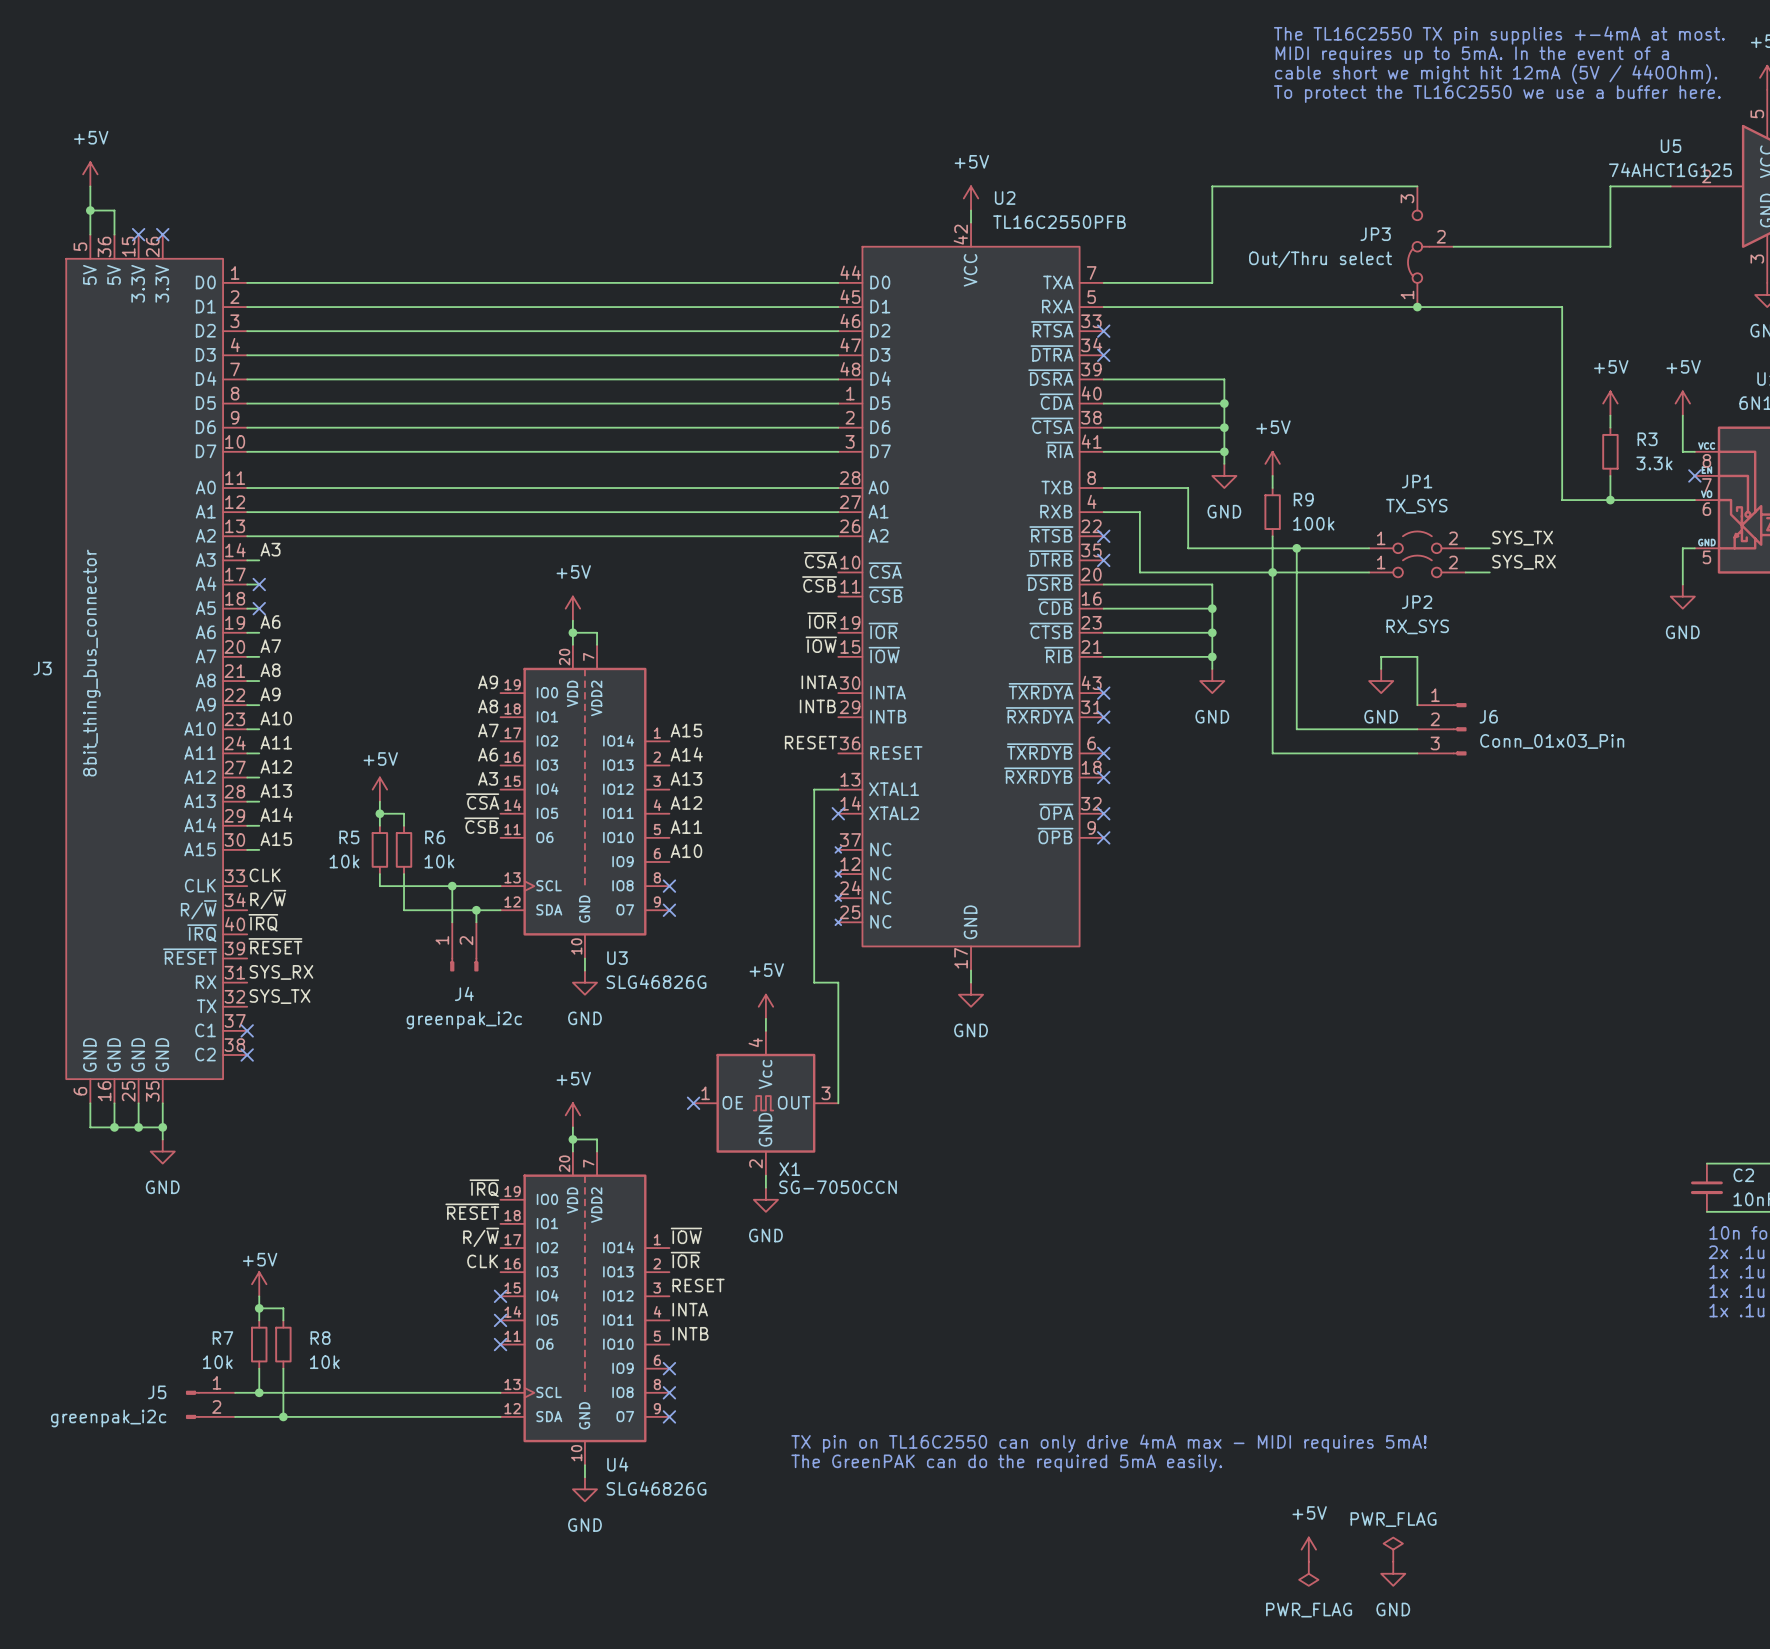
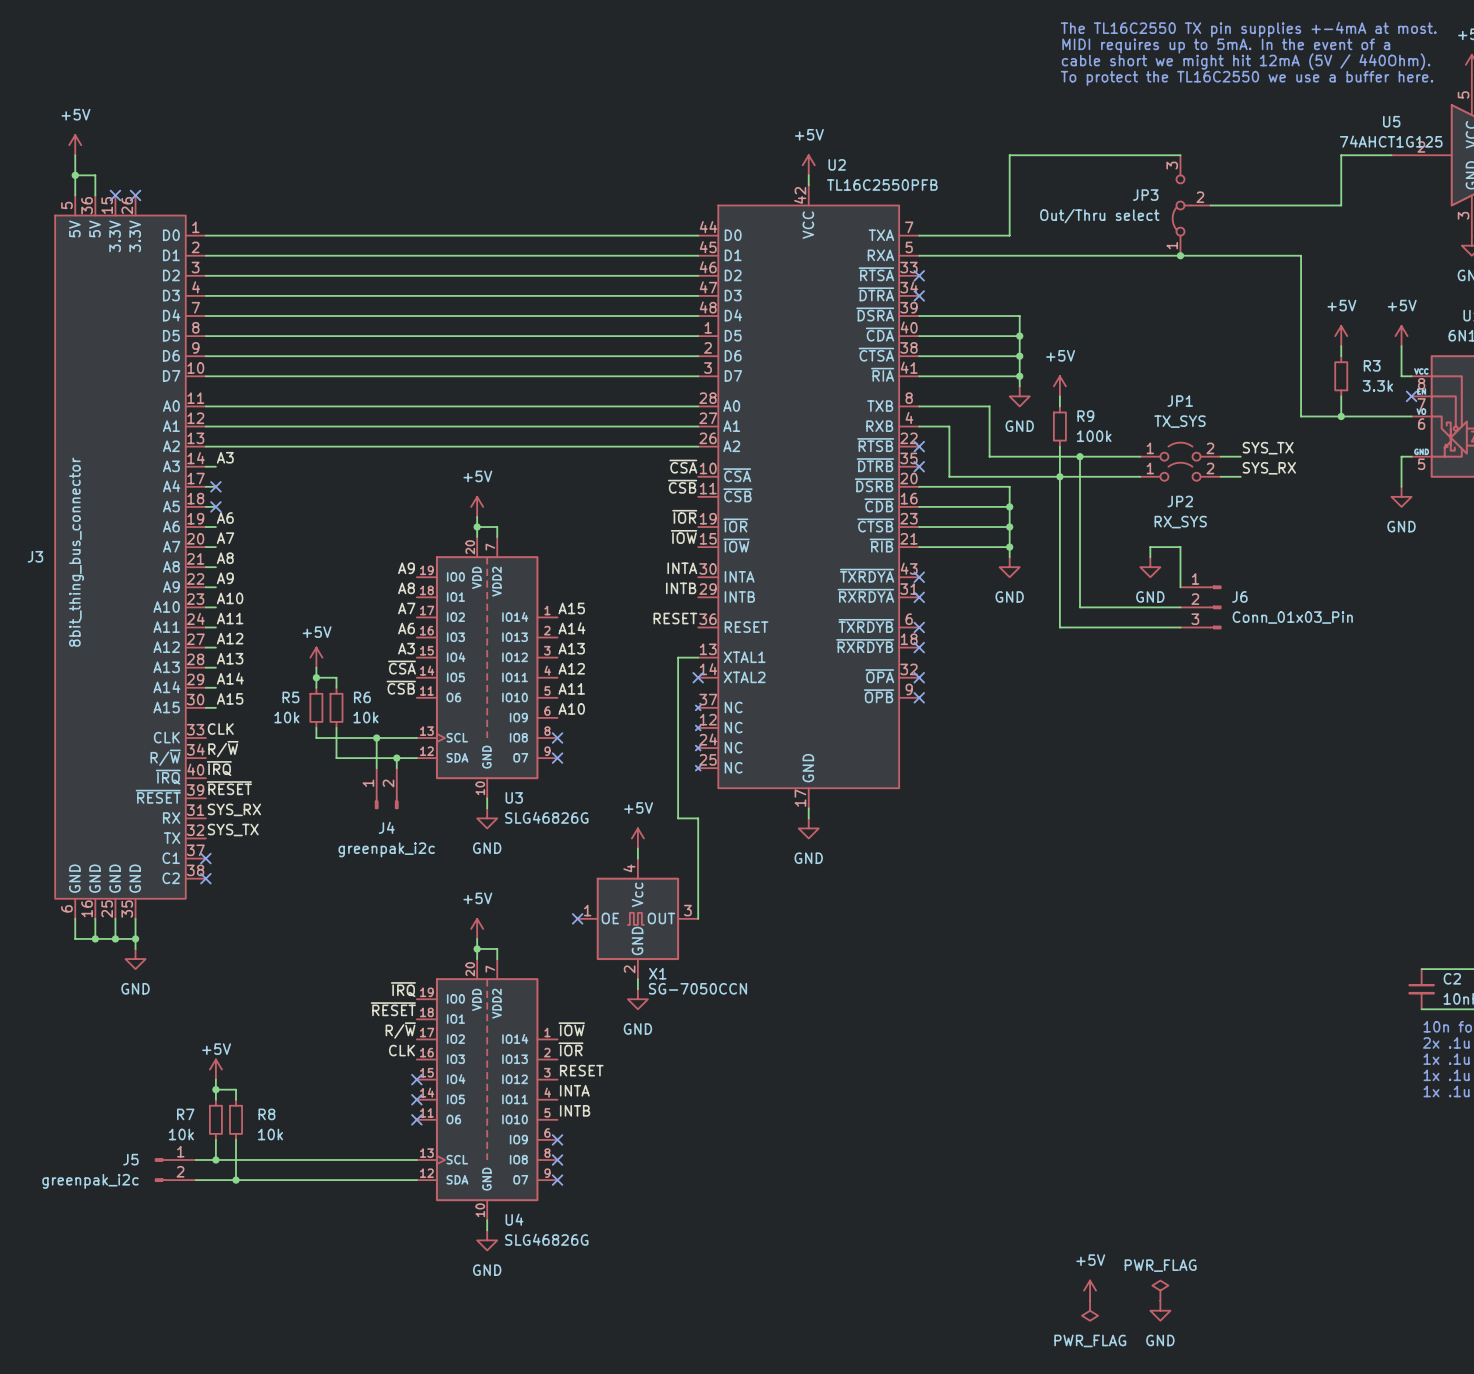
text: TX pin on TL16C2550 can only drive 4mA max - MIDI requires 5mA! (1108, 1443) -> none
text: The GreenPAK can do the required 5mA easily. (1006, 1463) -> none

